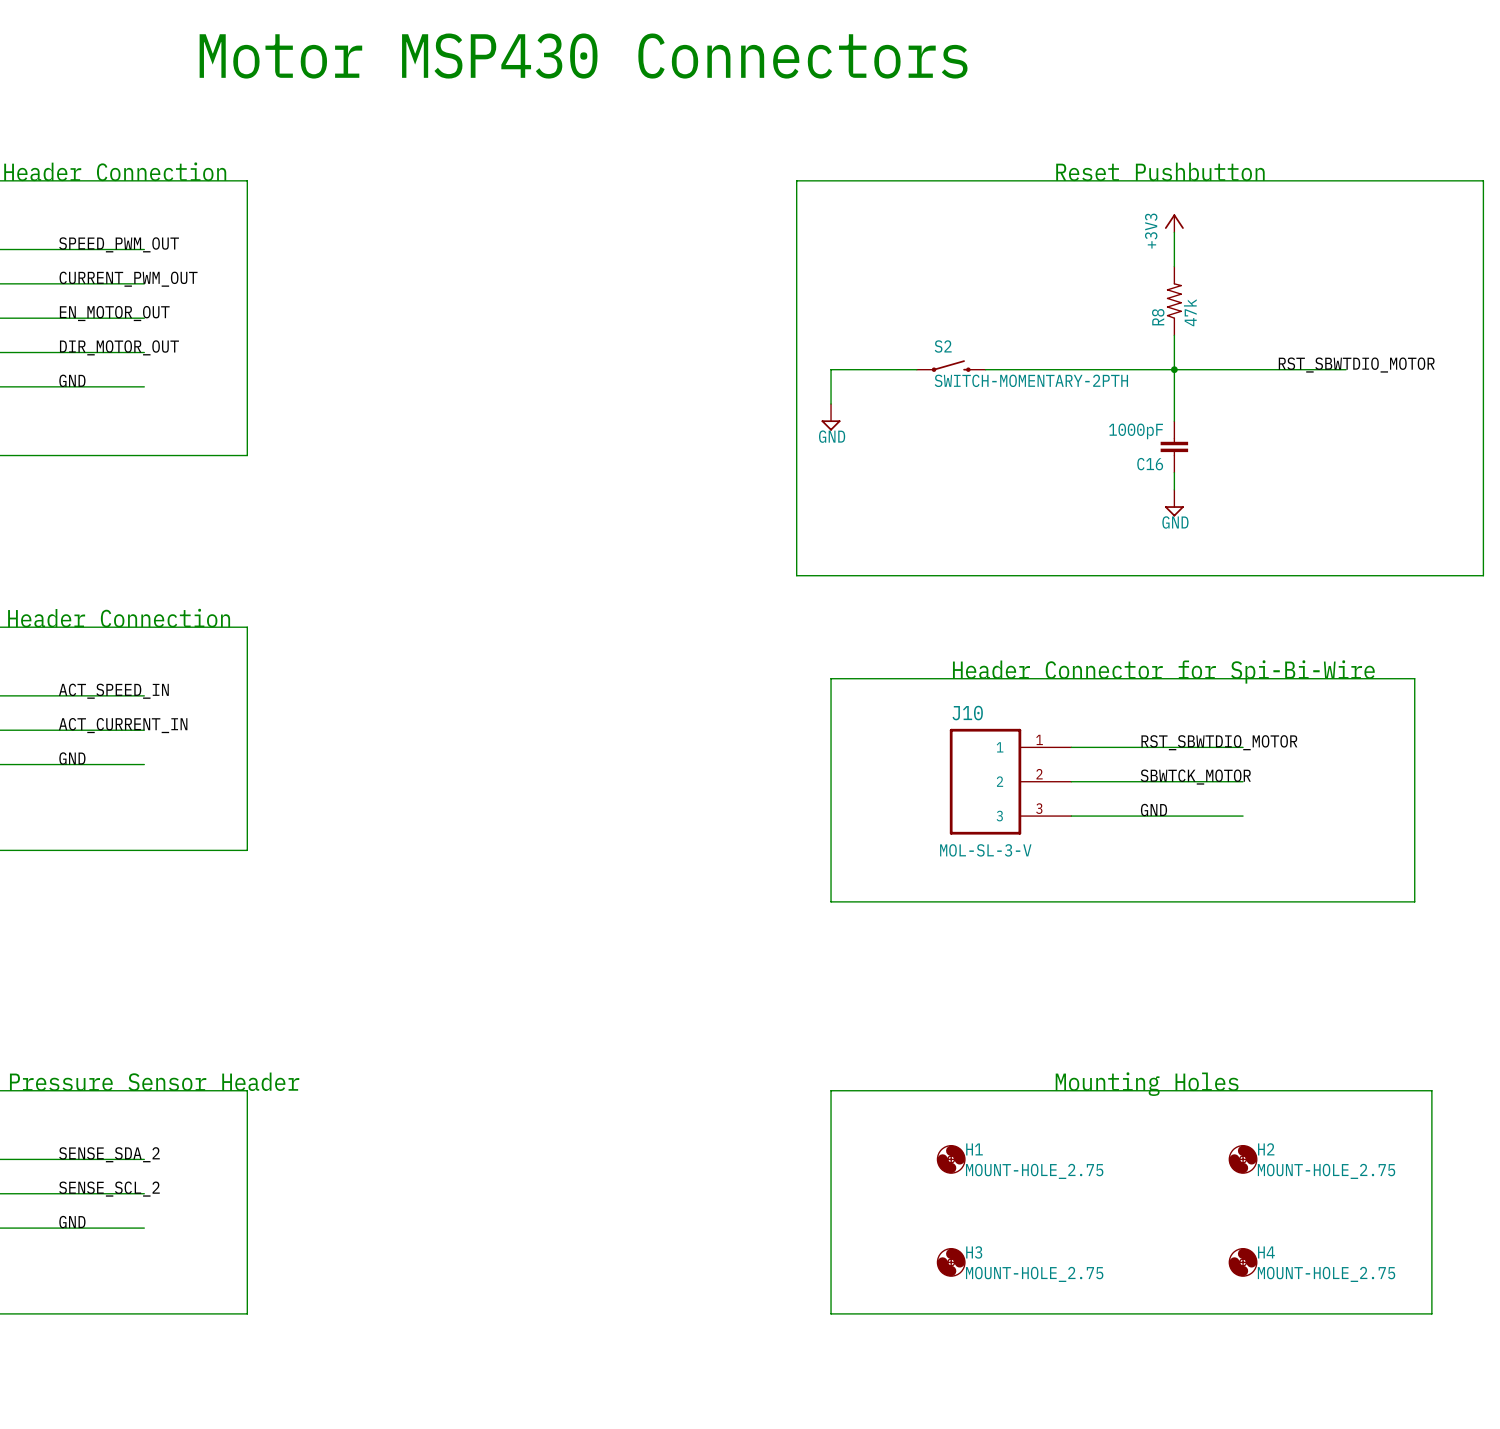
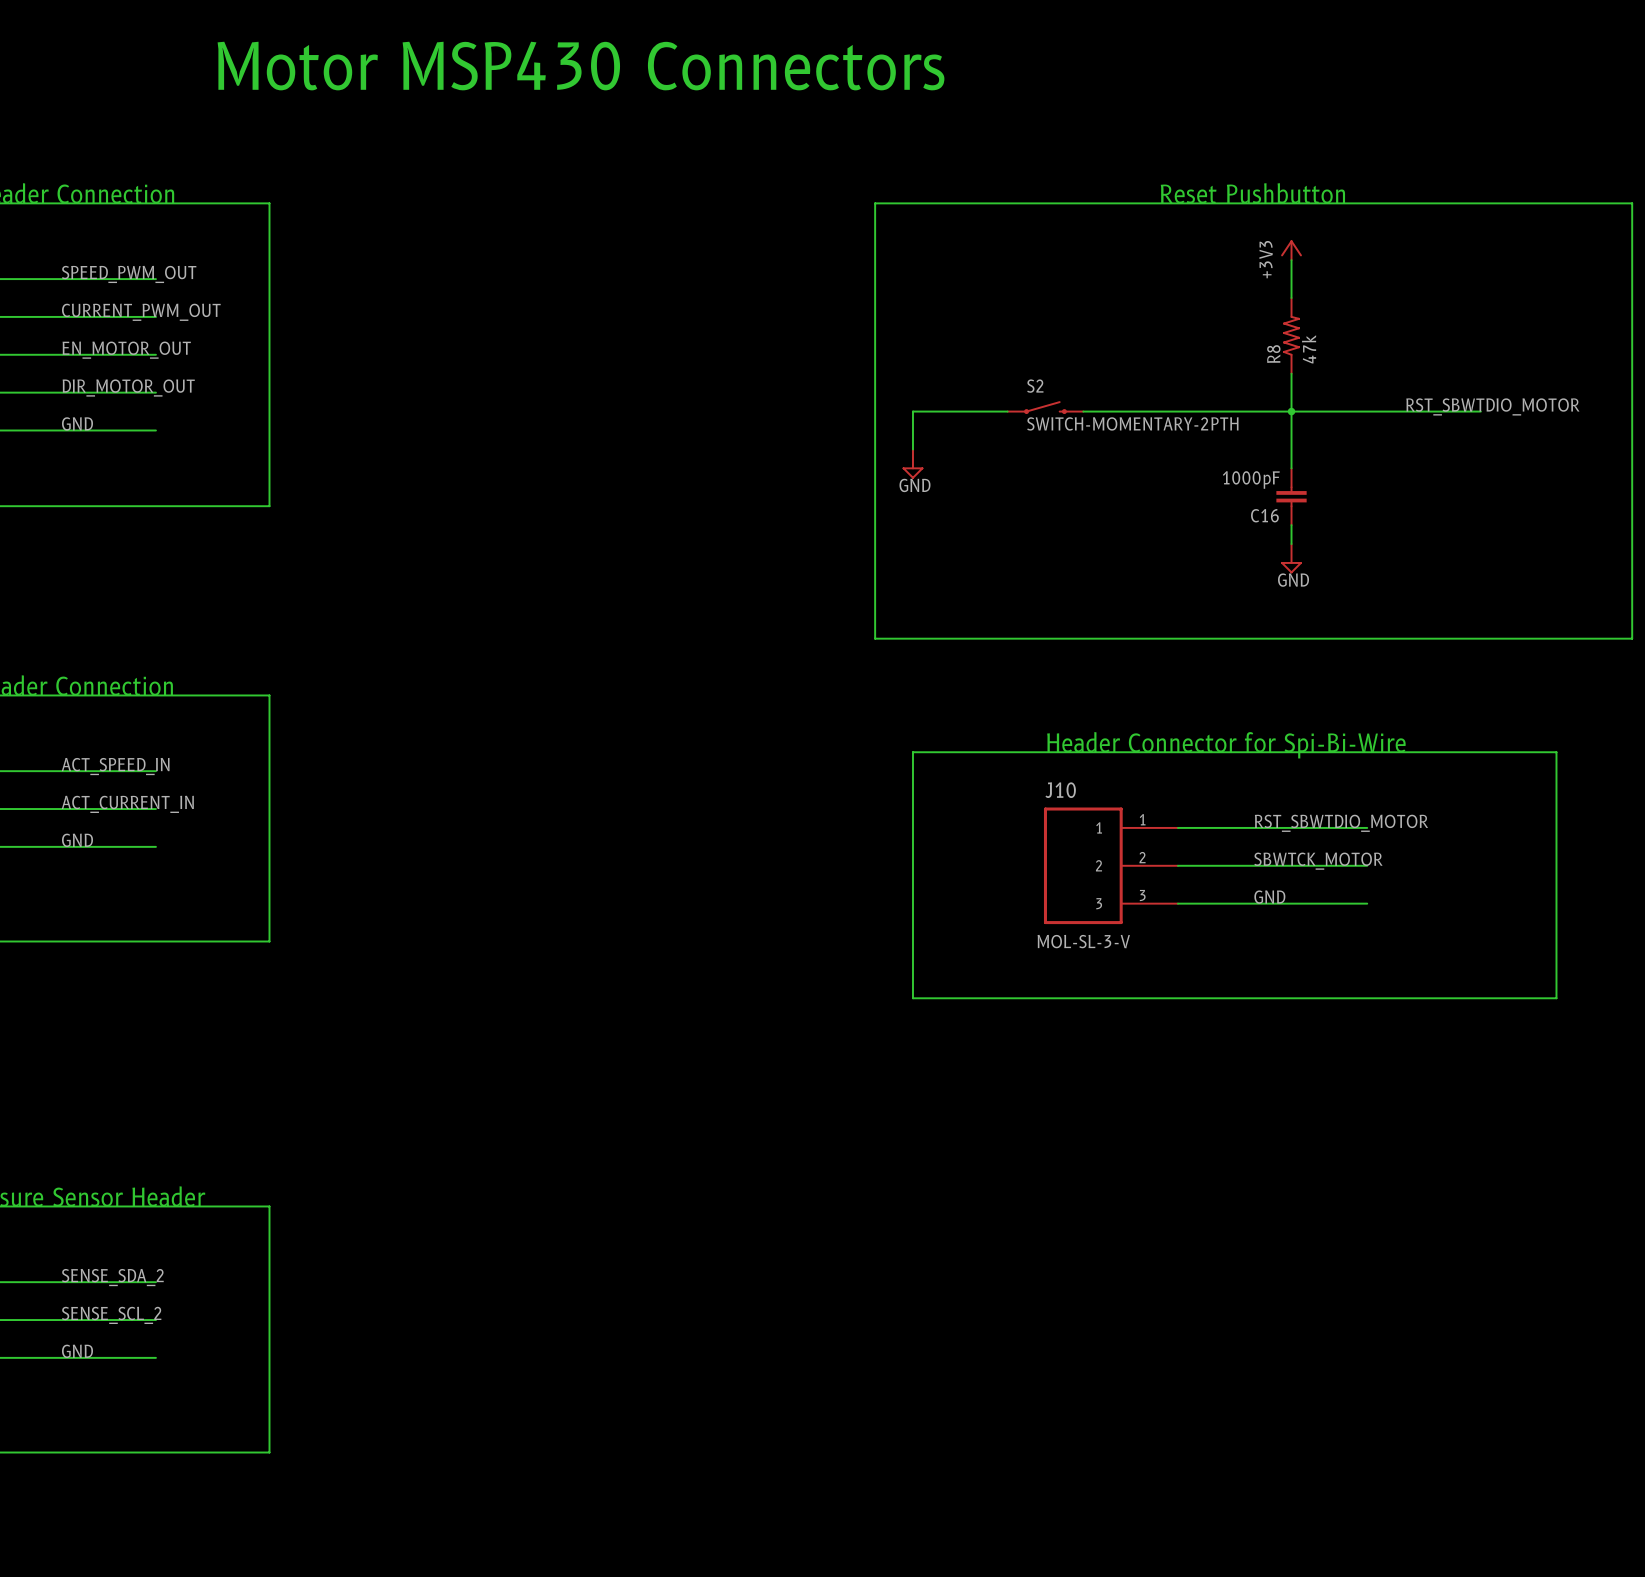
text: Mounting Holes (1147, 1084) -> none
wire: (831, 1090) (1431, 1090) (1431, 1313) (831, 1313) (831, 1090) -> none
H1: MOUNT-HOLE_2.75 (951, 1159) -> none
H2: MOUNT-HOLE_2.75 (1243, 1159) -> none
H3: MOUNT-HOLE_2.75 (951, 1262) -> none
H4: MOUNT-HOLE_2.75 (1243, 1262) -> none

